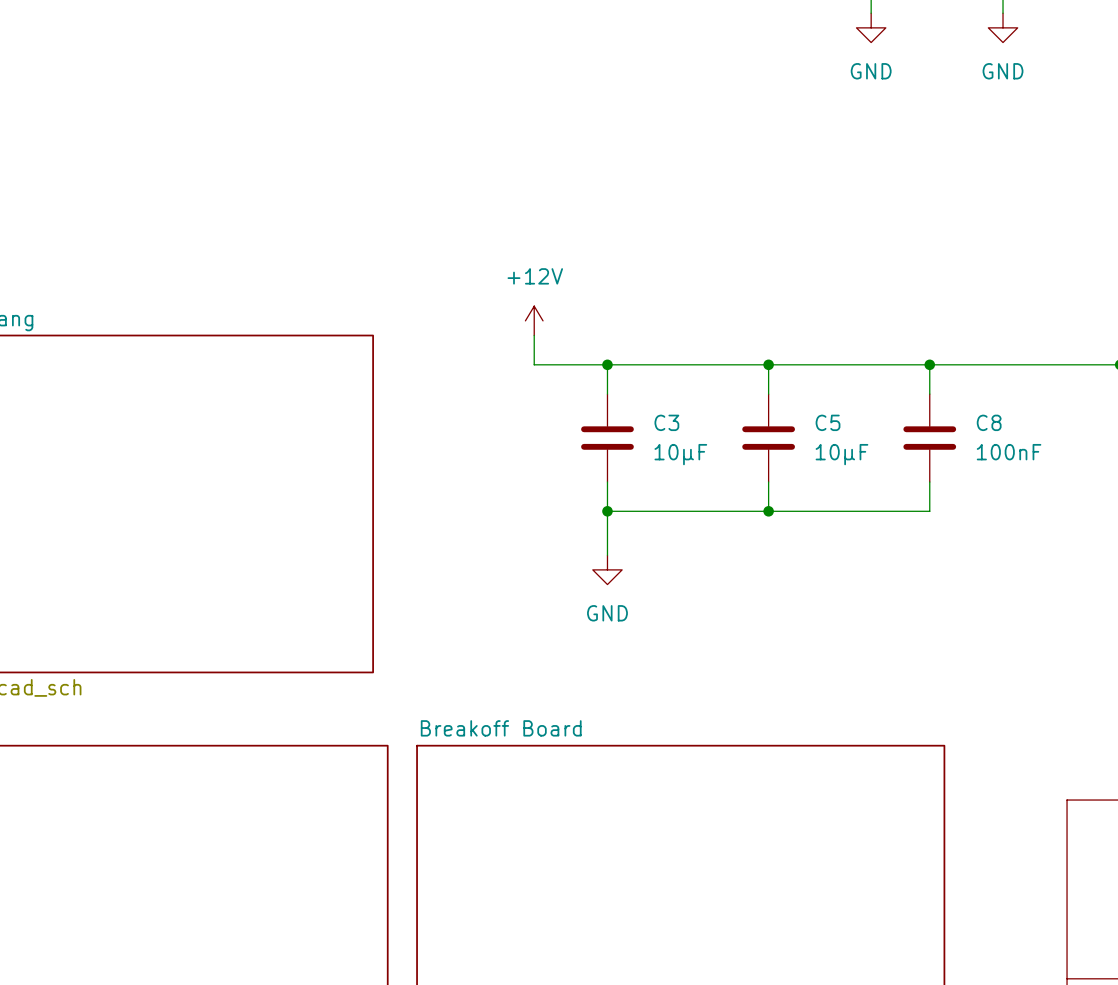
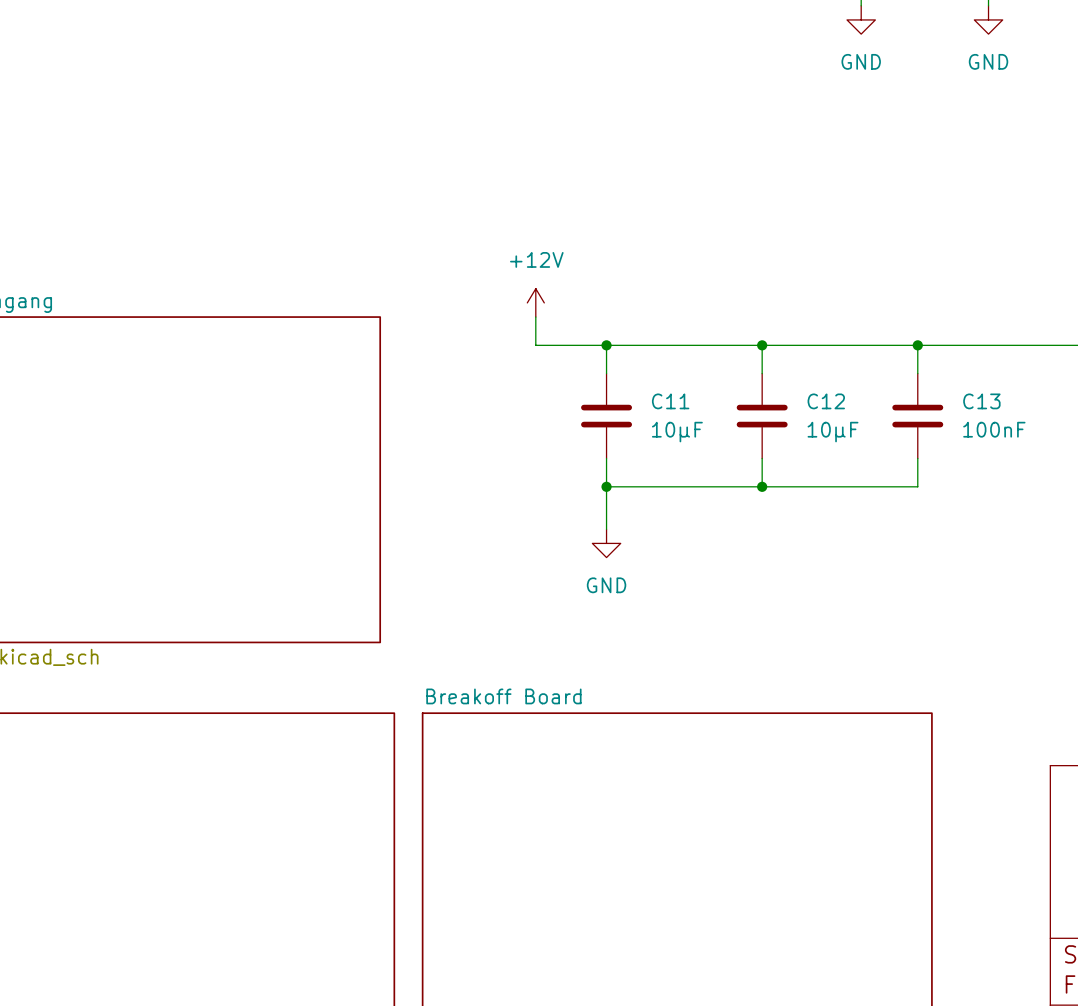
C3 name: C3 (666, 422) -> C11 (670, 401)
C5 name: C5 (828, 422) -> C12 (826, 401)
C8 name: C8 (989, 422) -> C13 (981, 401)

